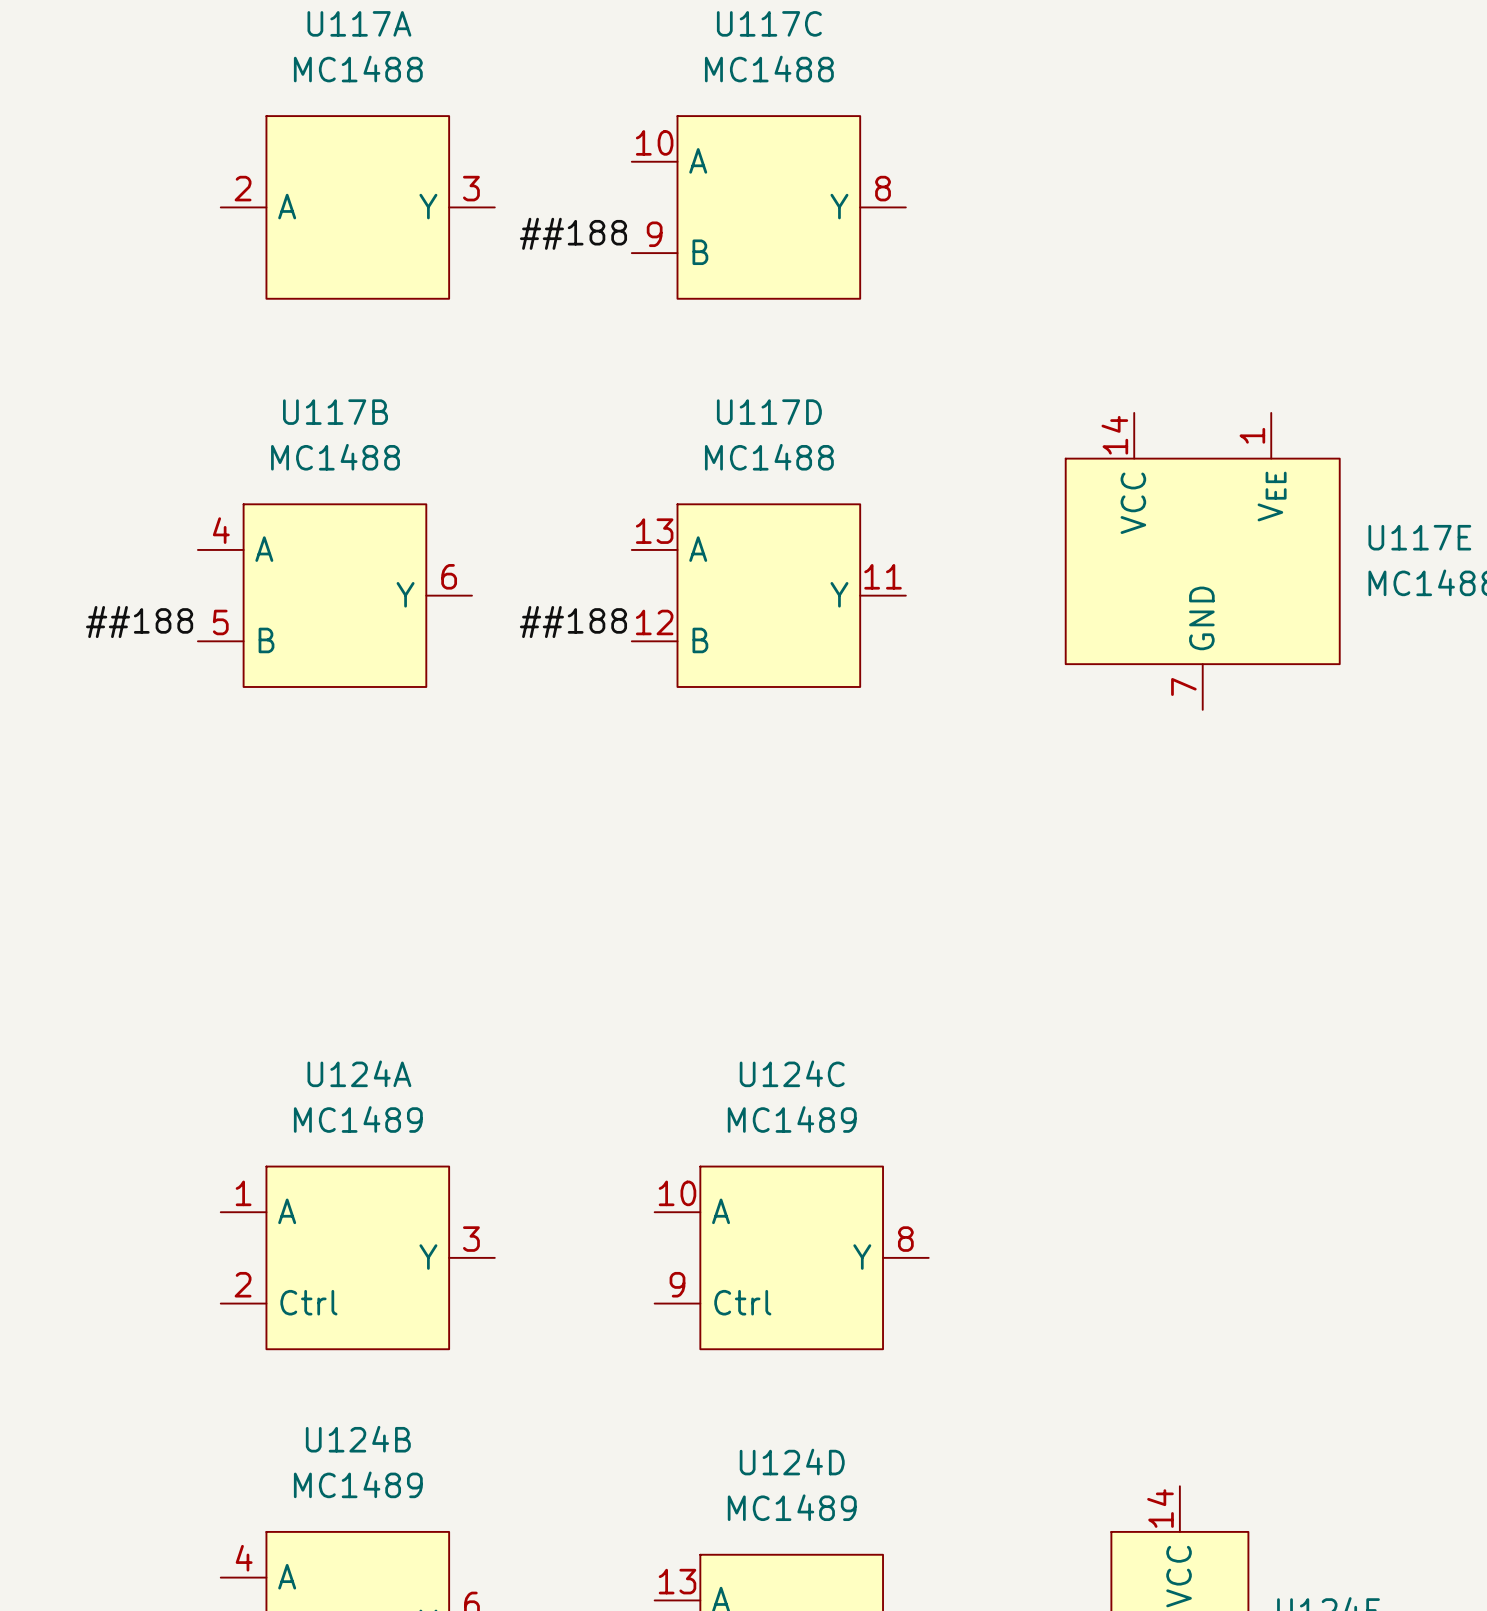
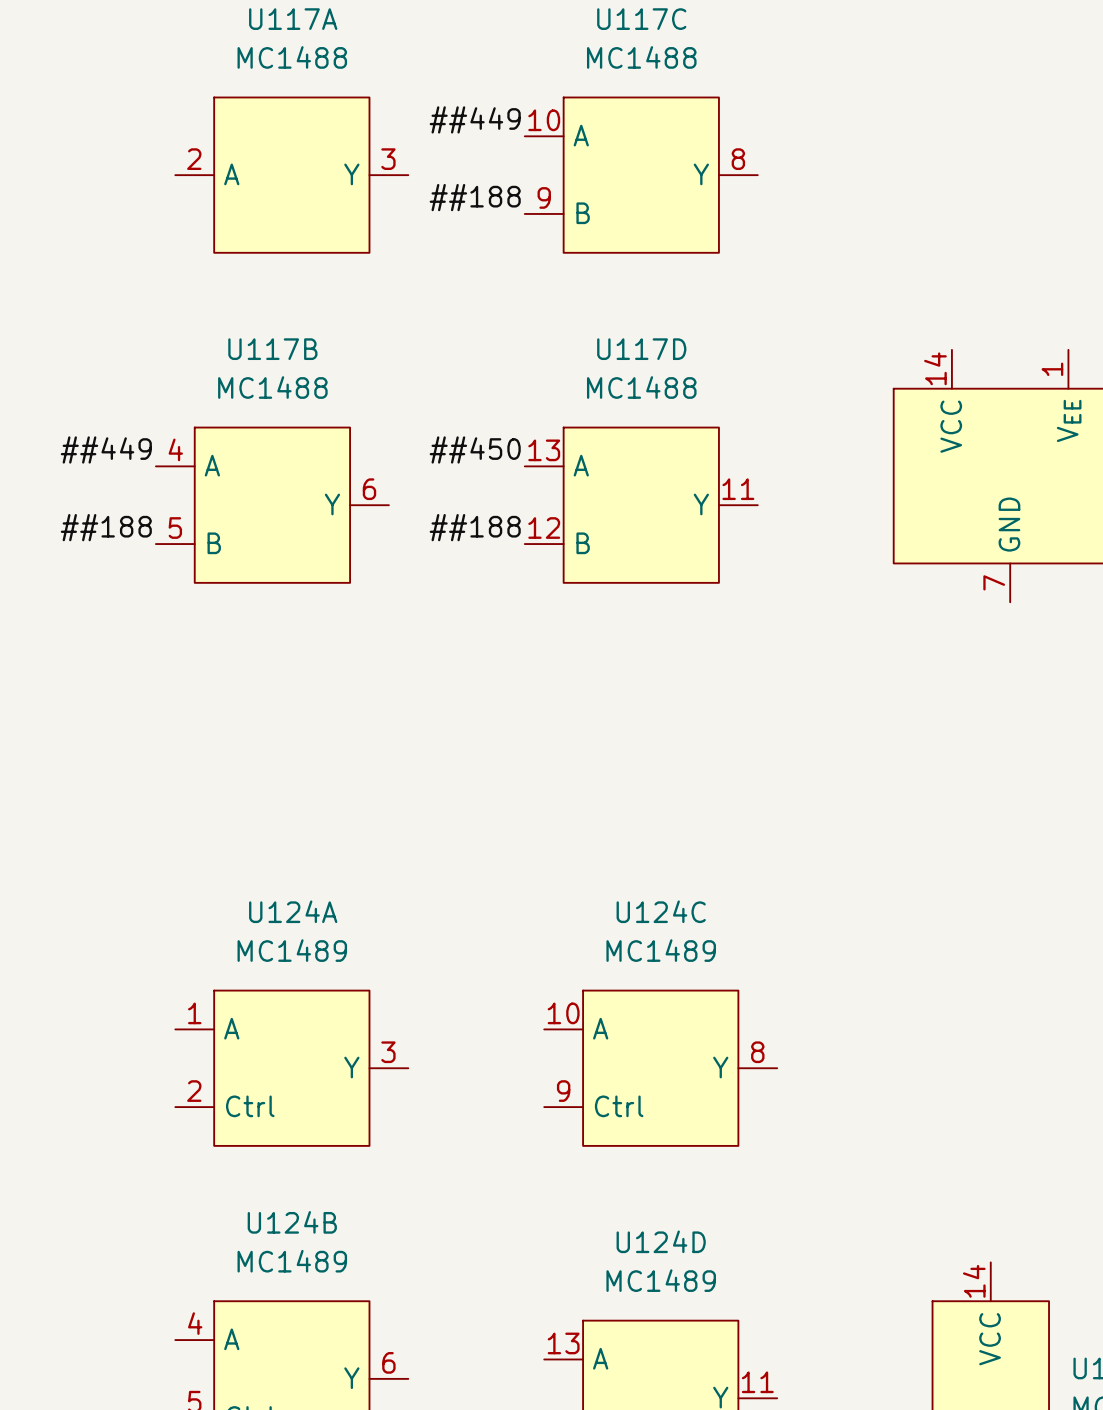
label: none -> ##449 (475, 119)
label: none -> ##449 (106, 449)
label: none -> ##450 (475, 449)

